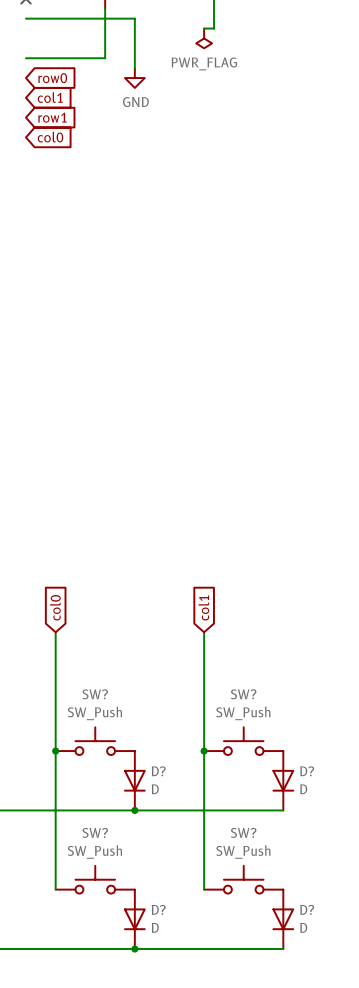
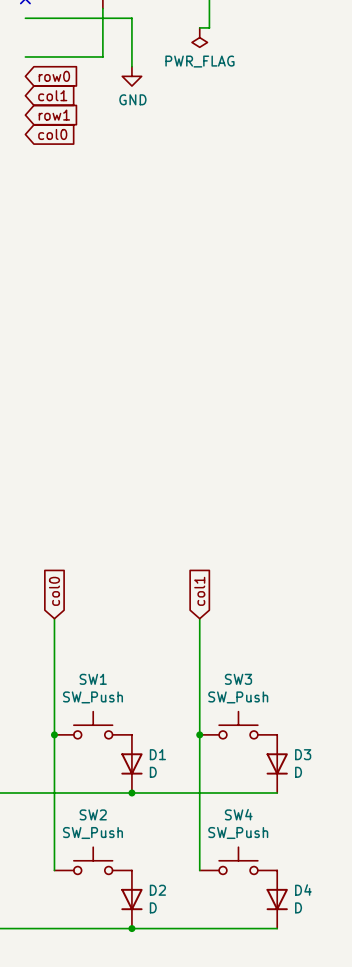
SW? name: SW? (95, 694) -> SW1 (93, 679)
SW? name: SW? (243, 694) -> SW3 (238, 679)
D? name: D? (158, 771) -> D1 (157, 754)
D? name: D? (307, 771) -> D3 (303, 754)
SW? name: SW? (95, 832) -> SW2 (93, 814)
SW? name: SW? (243, 832) -> SW4 (238, 814)
D? name: D? (158, 909) -> D2 (157, 890)
D? name: D? (307, 909) -> D4 (303, 890)

